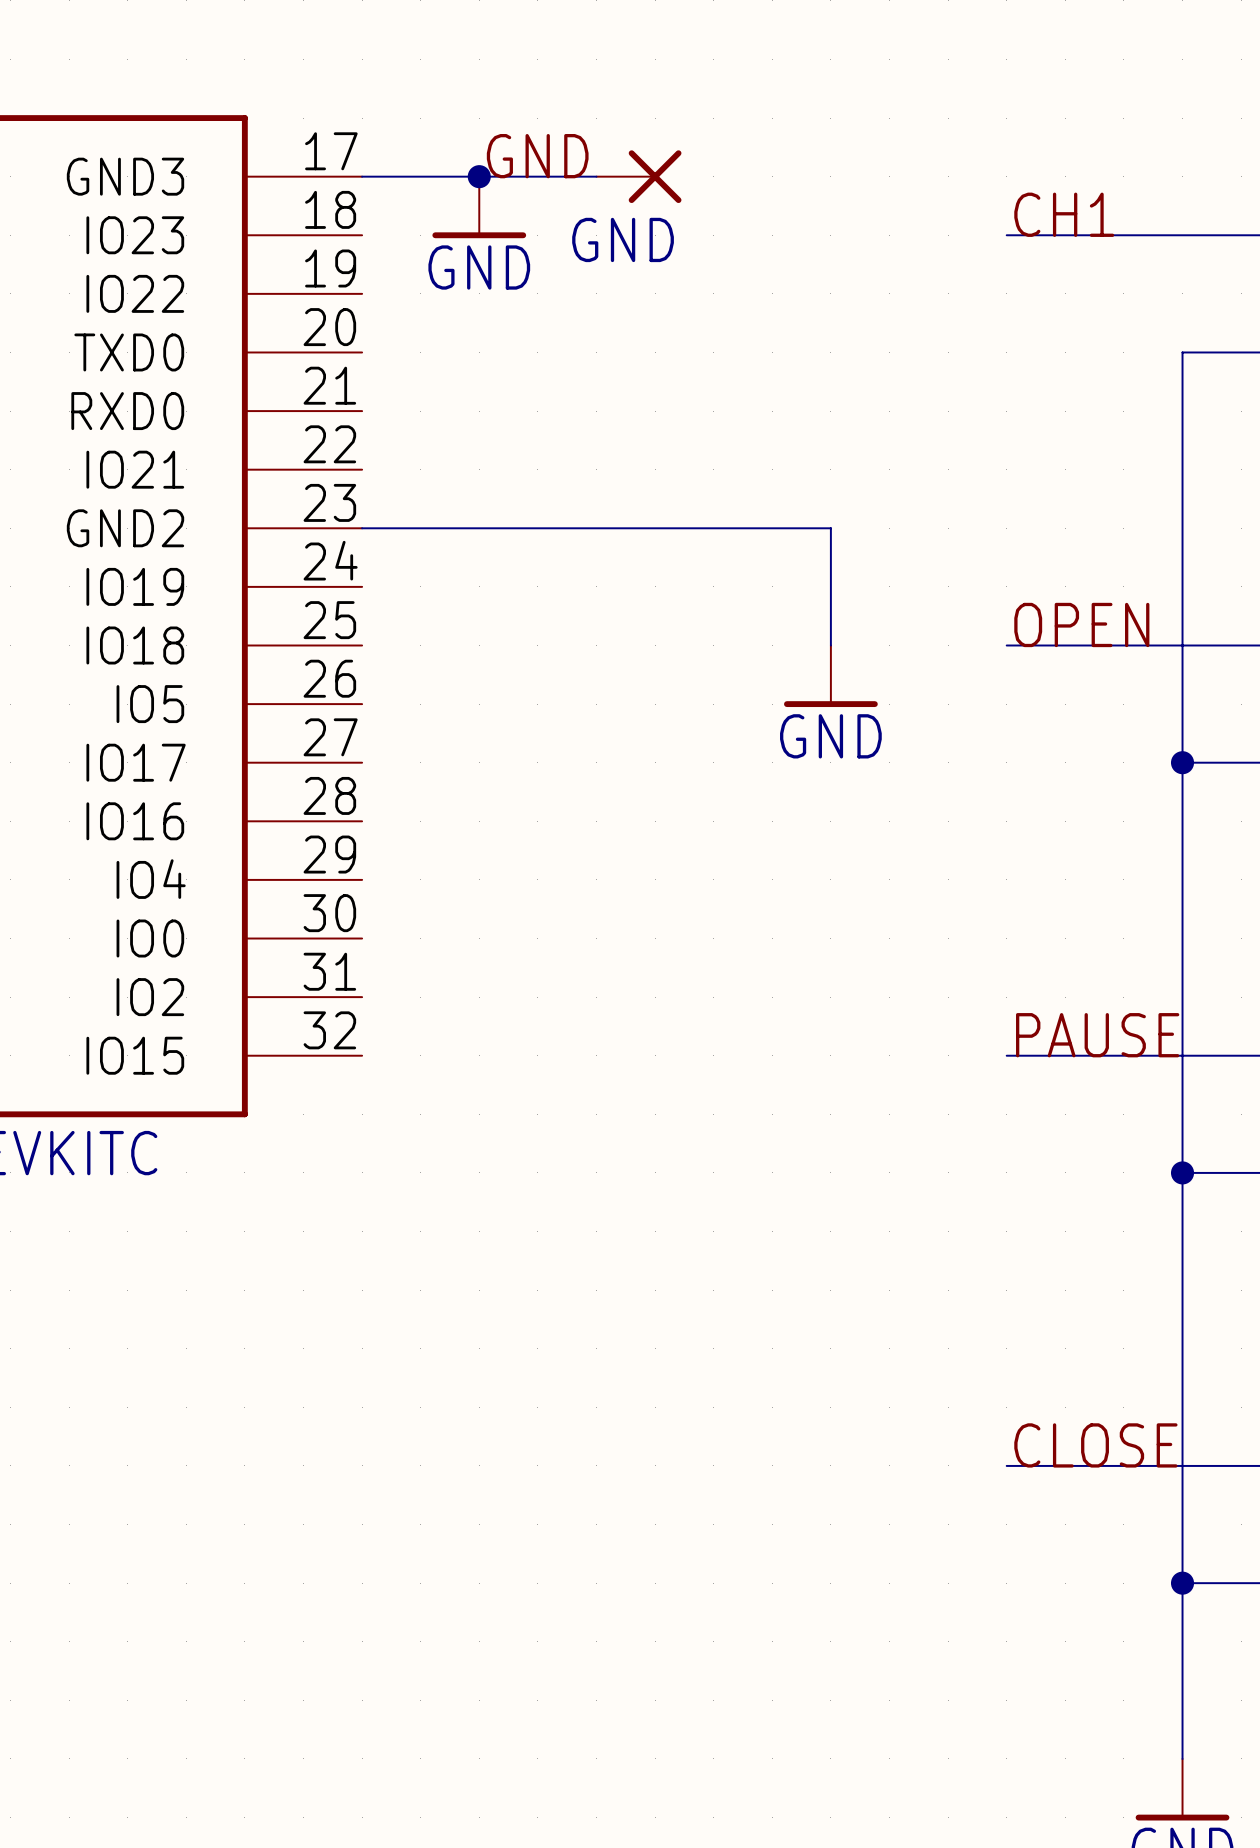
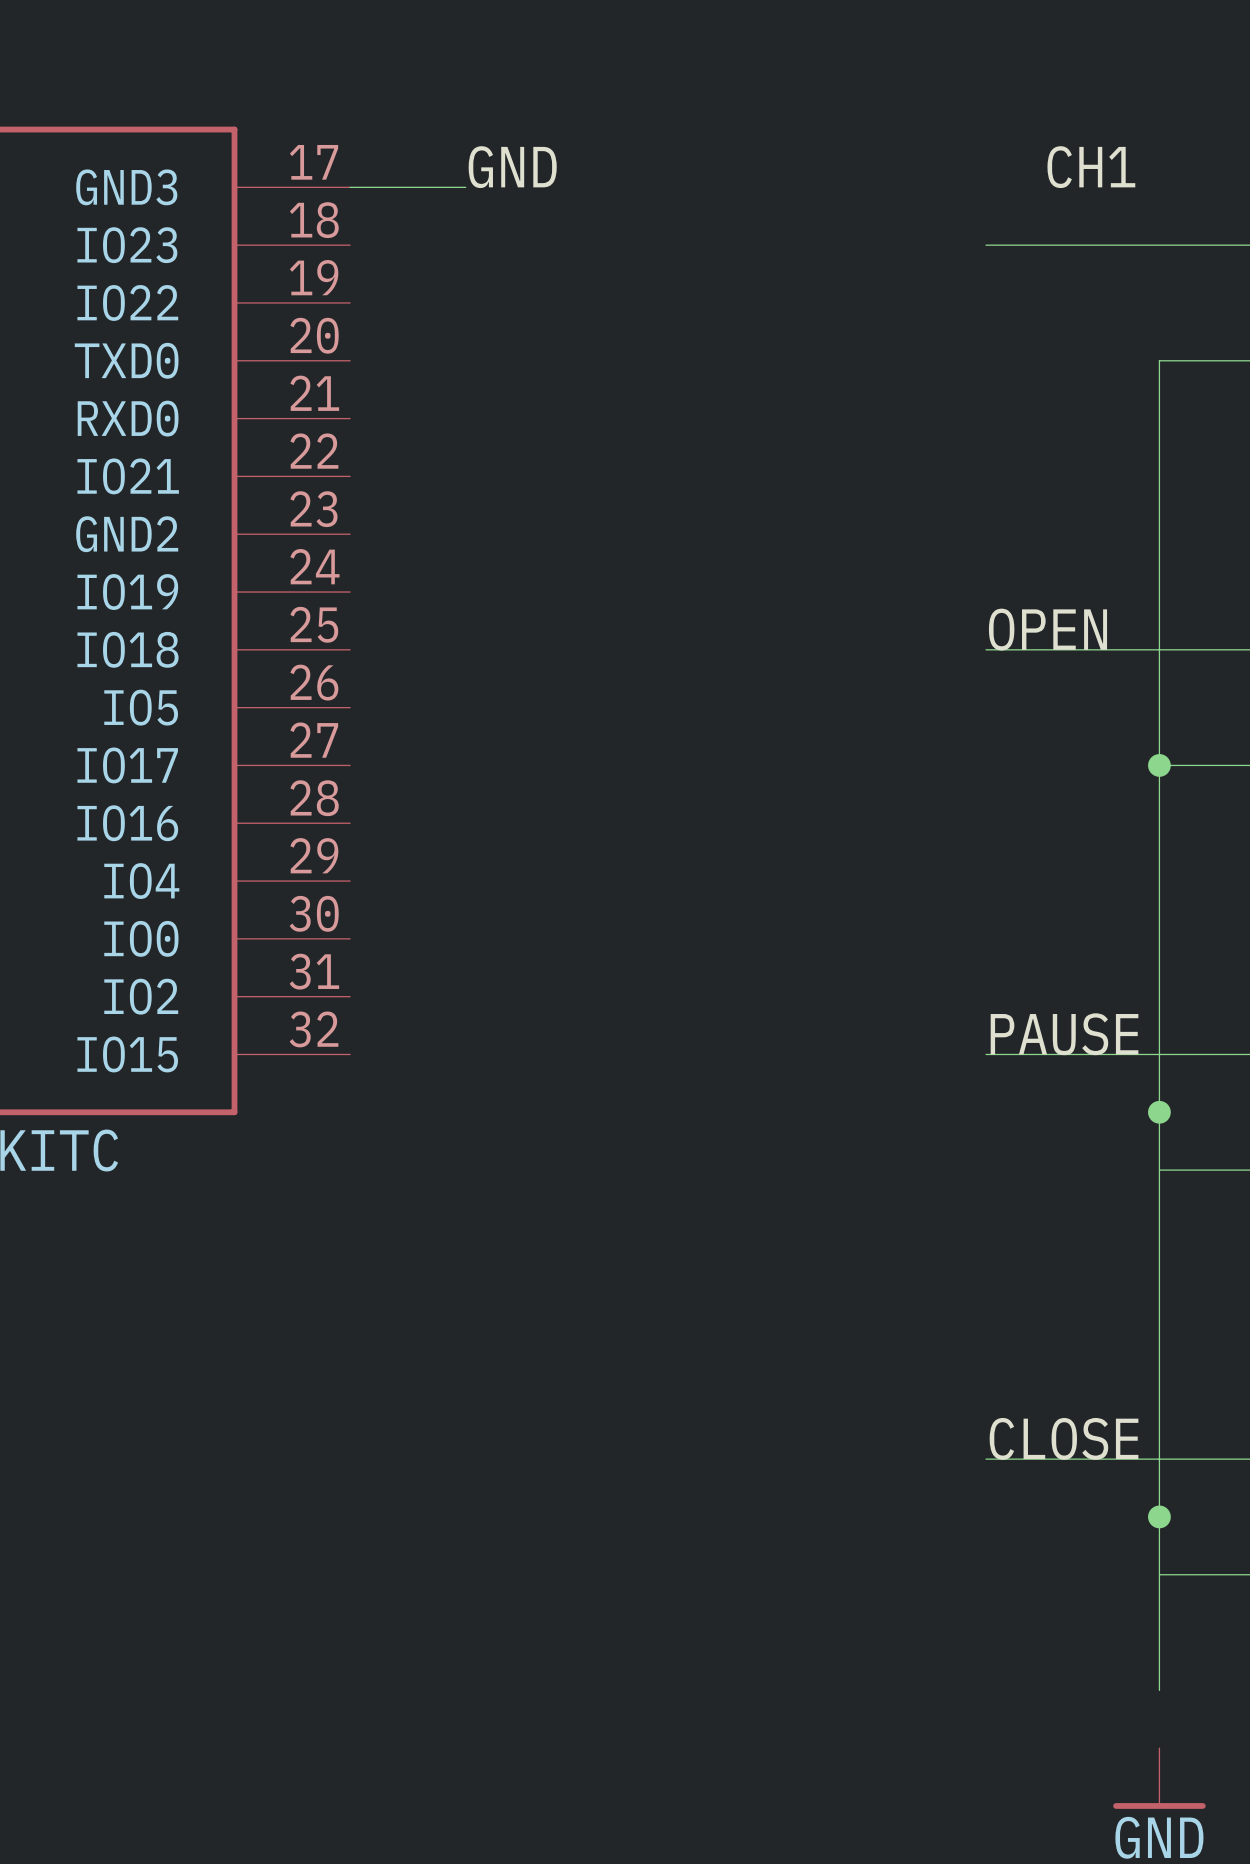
wire: (479, 176) (596, 176) -> none
junction: (479, 176) -> none
GND: (638, 176) -> none
power symbol: GND (479, 207) -> none
label position: CH1 (1064, 214) -> CH1 (1091, 167)
wire: (362, 528) (830, 528) (830, 645) -> none
power symbol: GND (830, 676) -> none
junction position: (1182, 1172) -> (1159, 1112)
junction position: (1182, 1583) -> (1159, 1516)
wire: (1182, 1700) (1182, 1758) -> none

